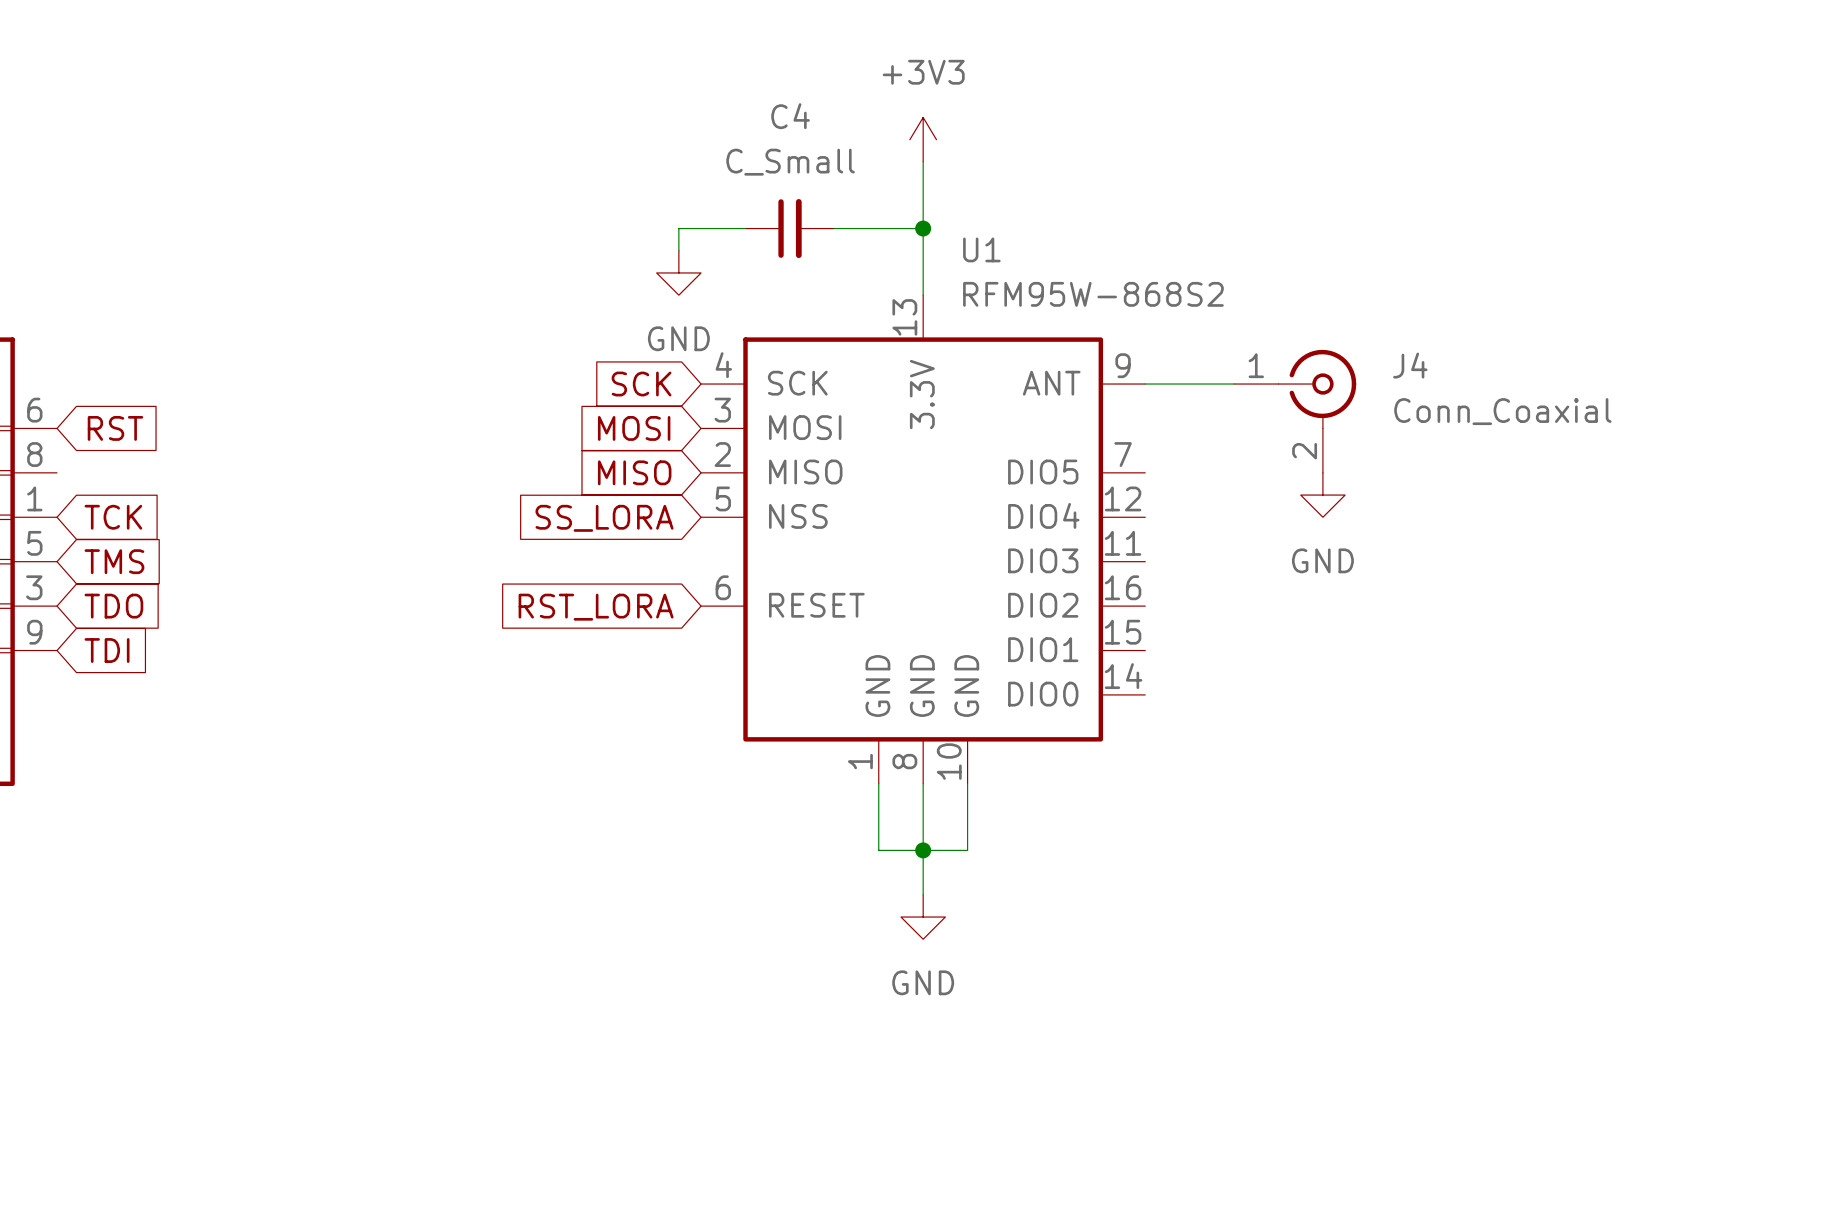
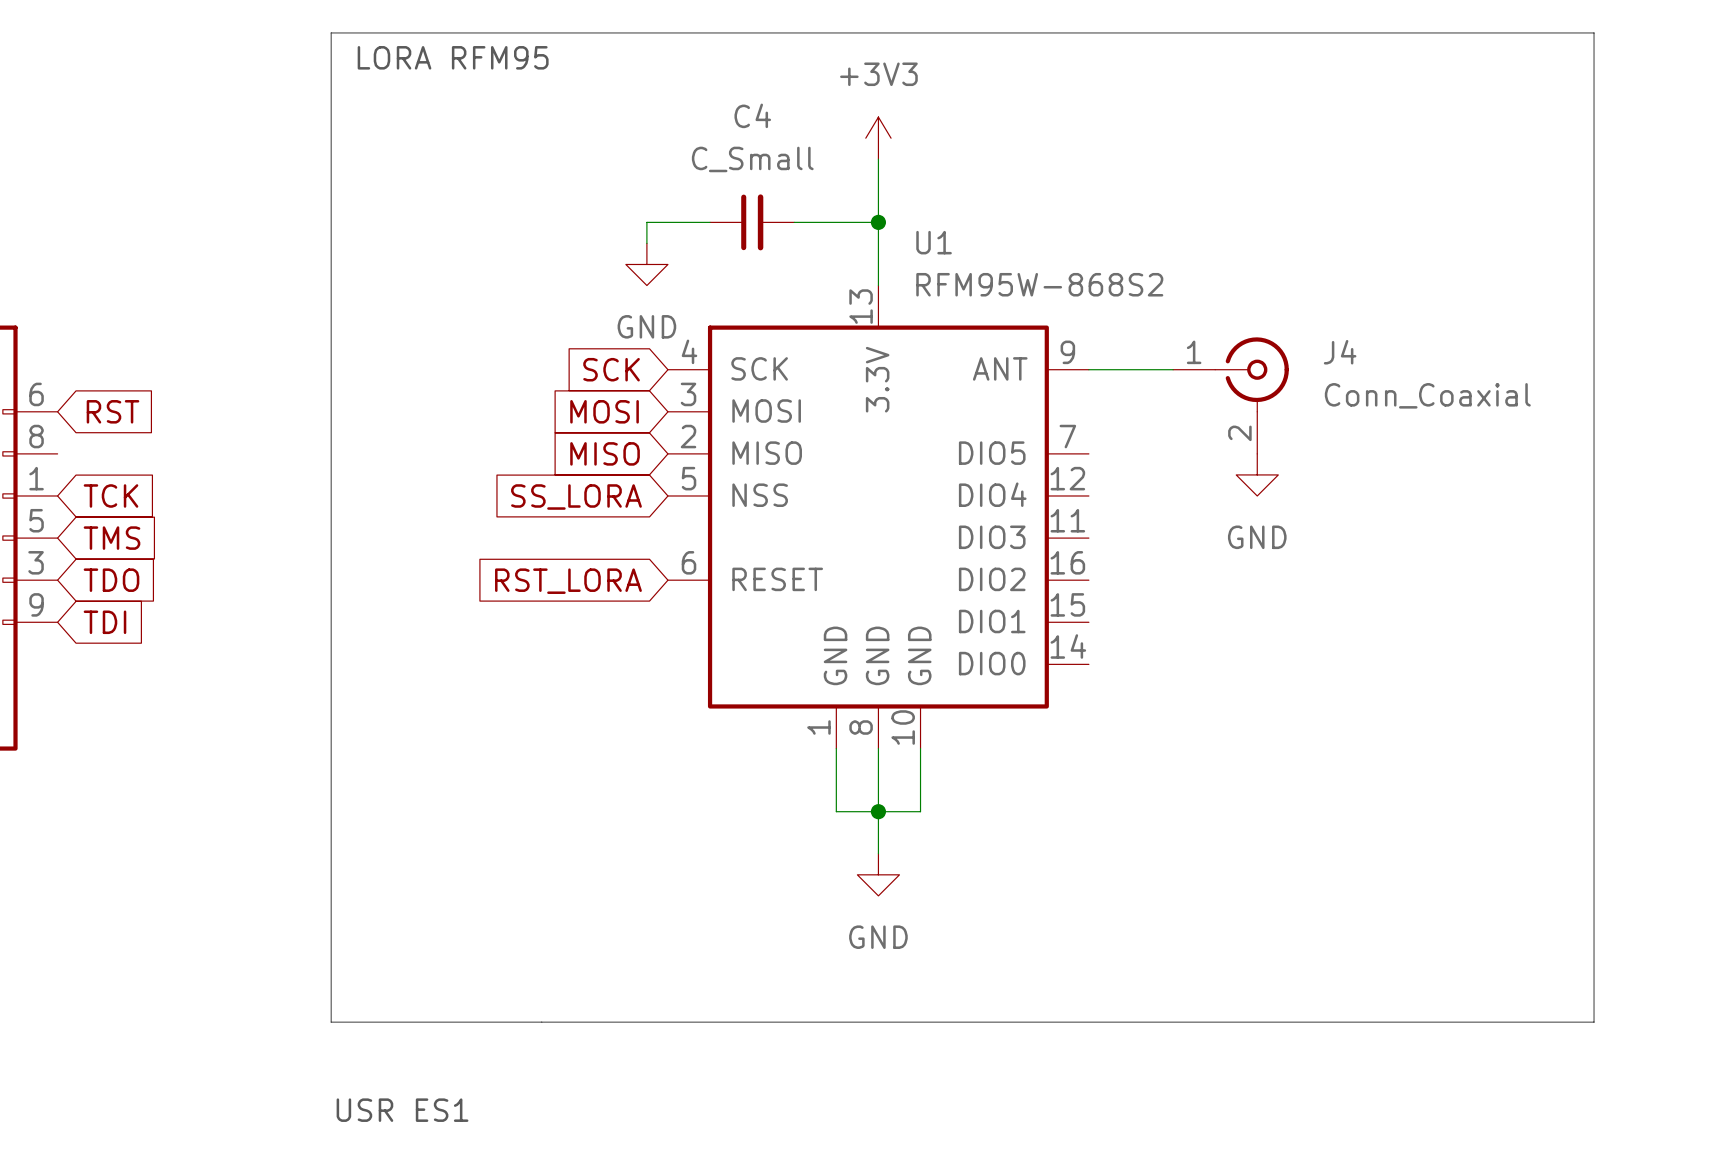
line: none -> (331, 32) (1594, 32) (1594, 1022) (331, 1022) (331, 32)
text: none -> LORA RFM95 (453, 57)
text: none -> USR ES1 (402, 1110)

